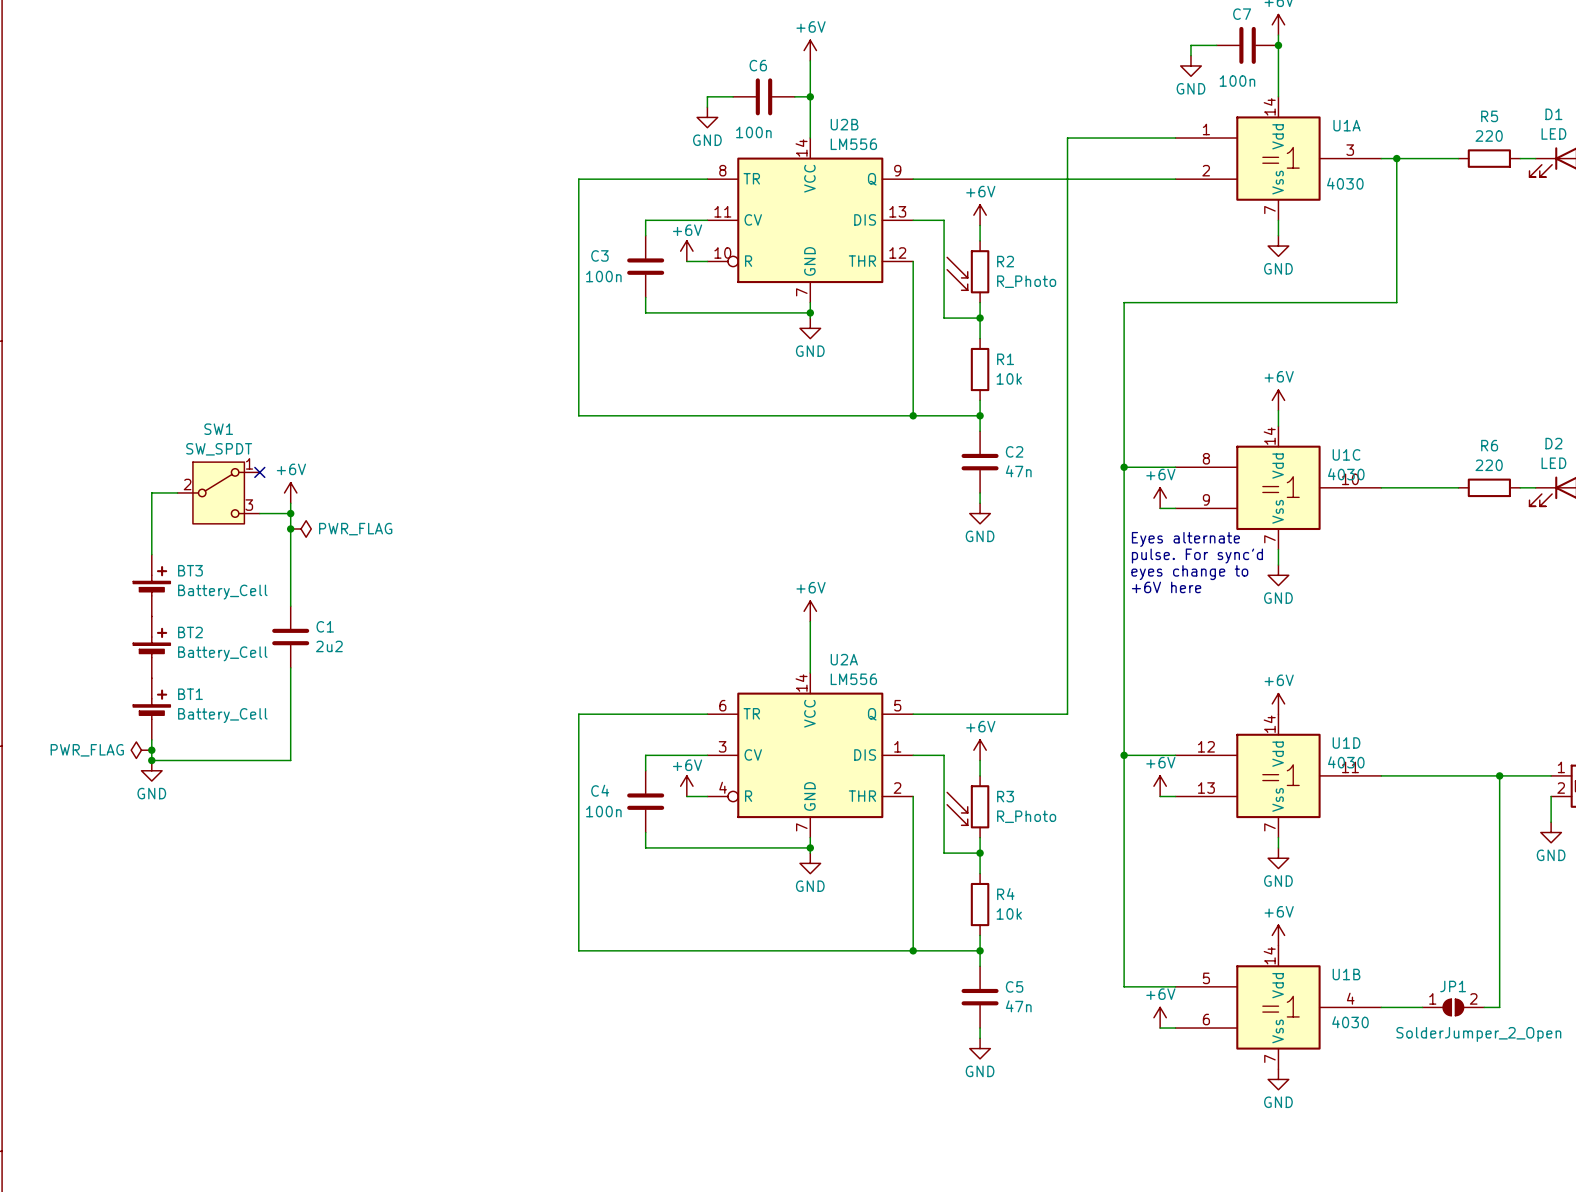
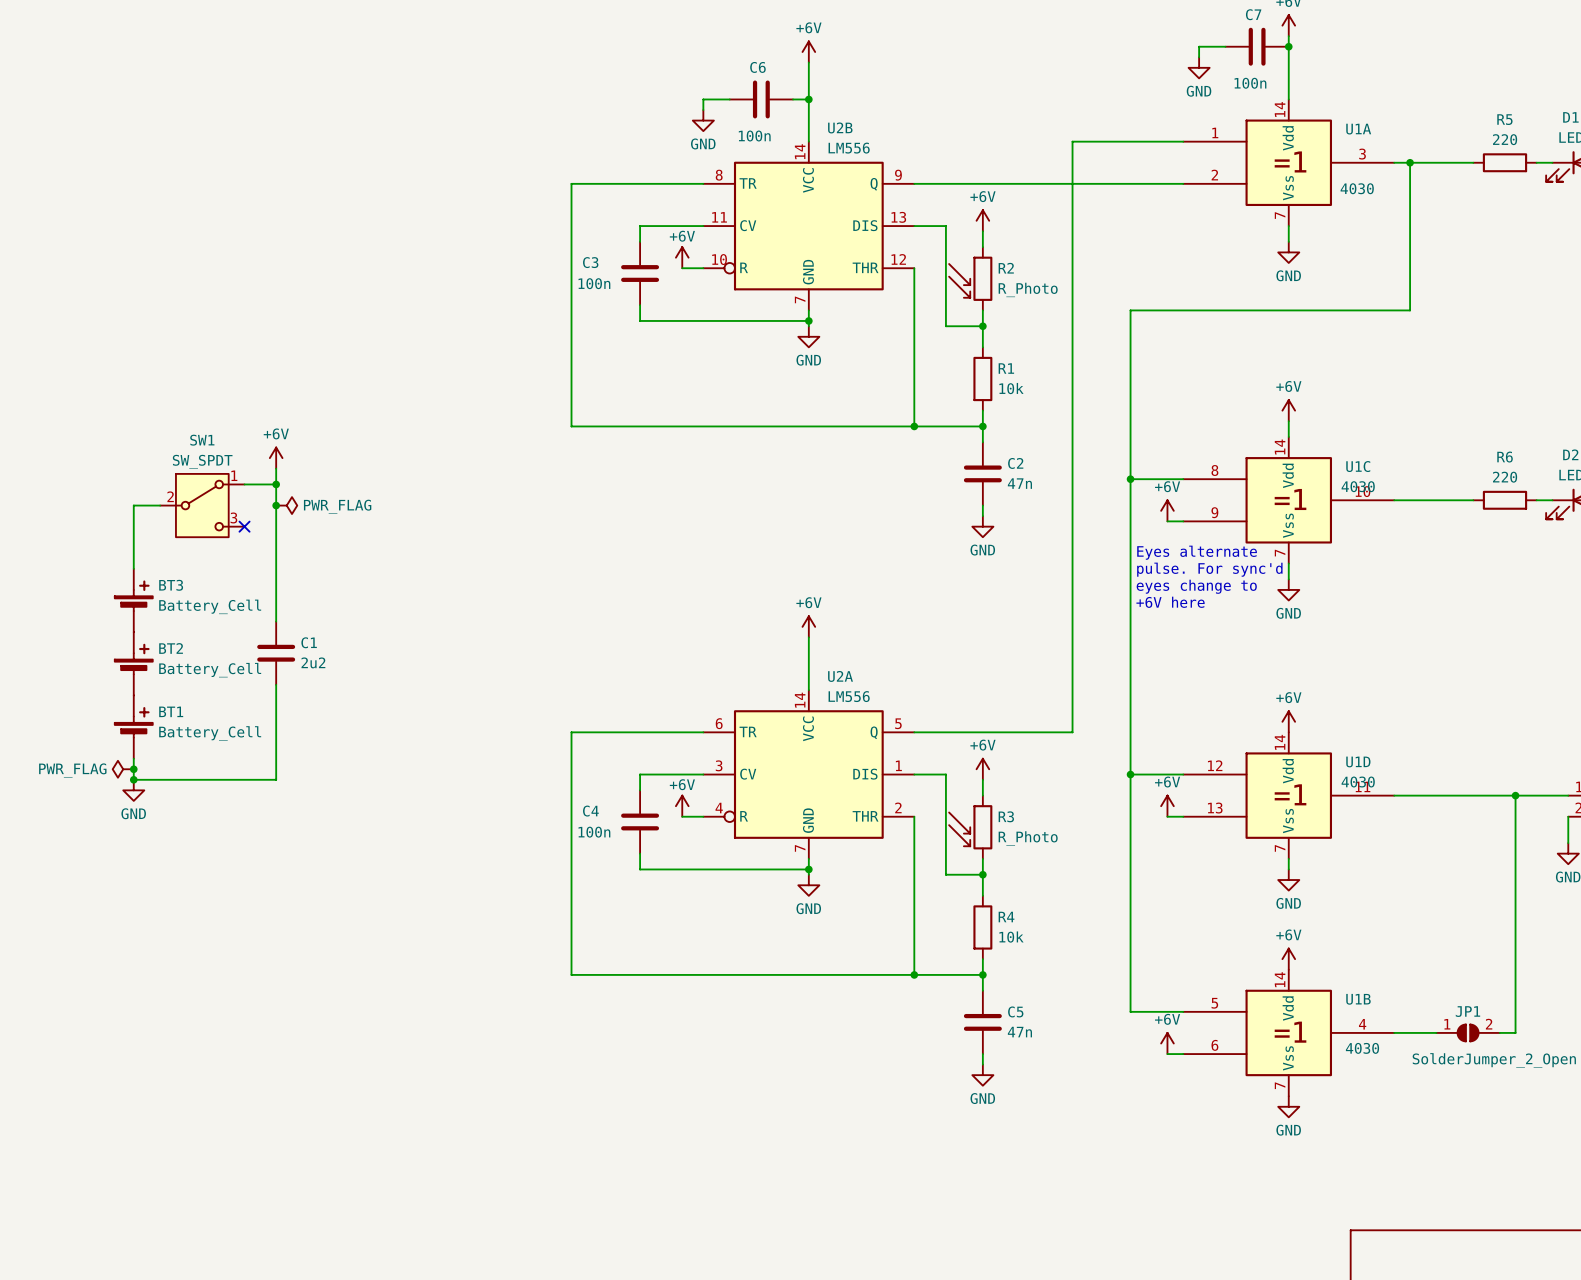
no-connect mark position: (259, 472) -> (244, 526)
junction: none -> (276, 484)
junction: none -> (276, 505)
power symbol position: +6V (290, 492) -> +6V (276, 458)
wire: (259, 513) (290, 513) -> (244, 484) (276, 484)
junction: (290, 513) -> none
junction: (290, 528) -> none
power symbol position: PWR_FLAG (300, 528) -> PWR_FLAG (286, 505)

